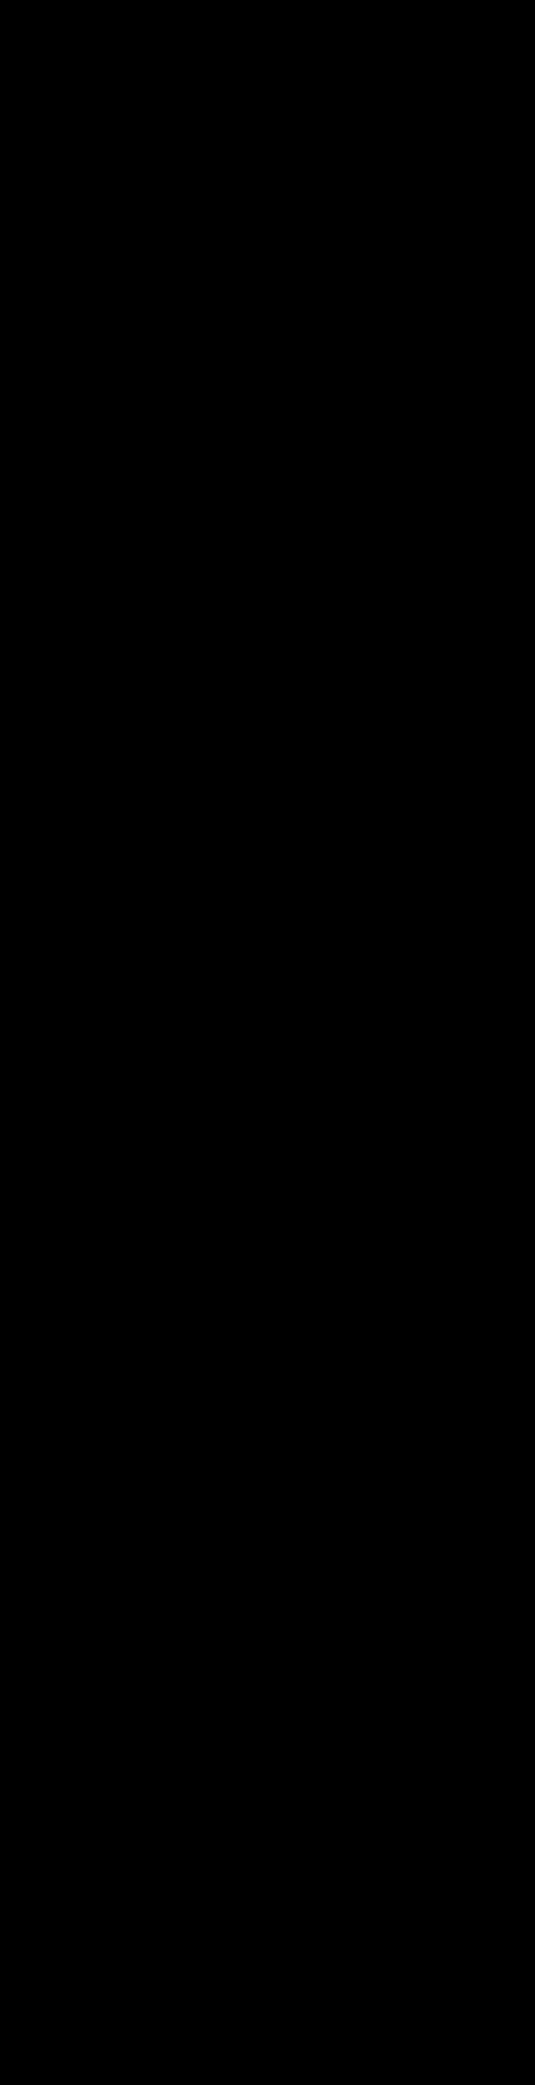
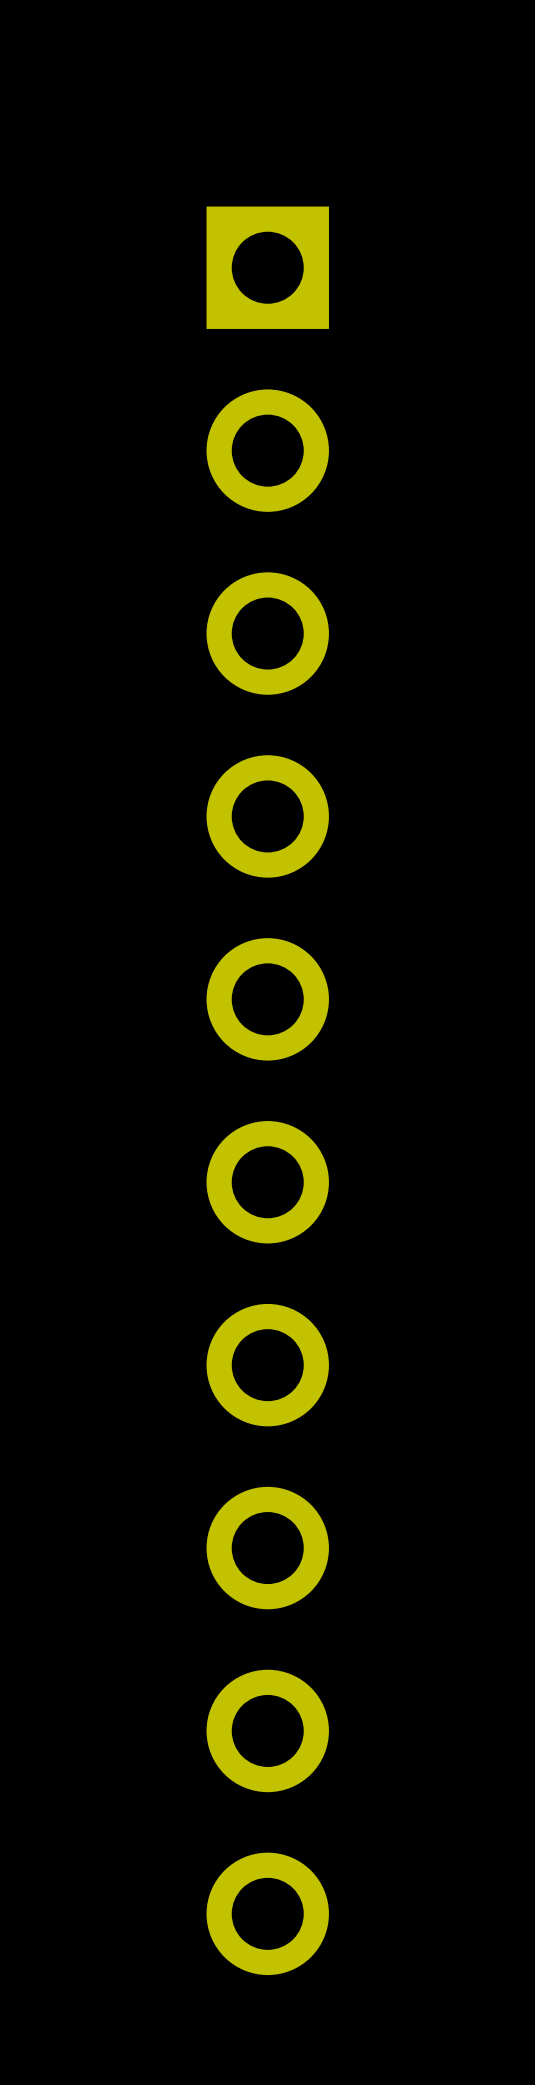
part: none -> (267, 1090)

